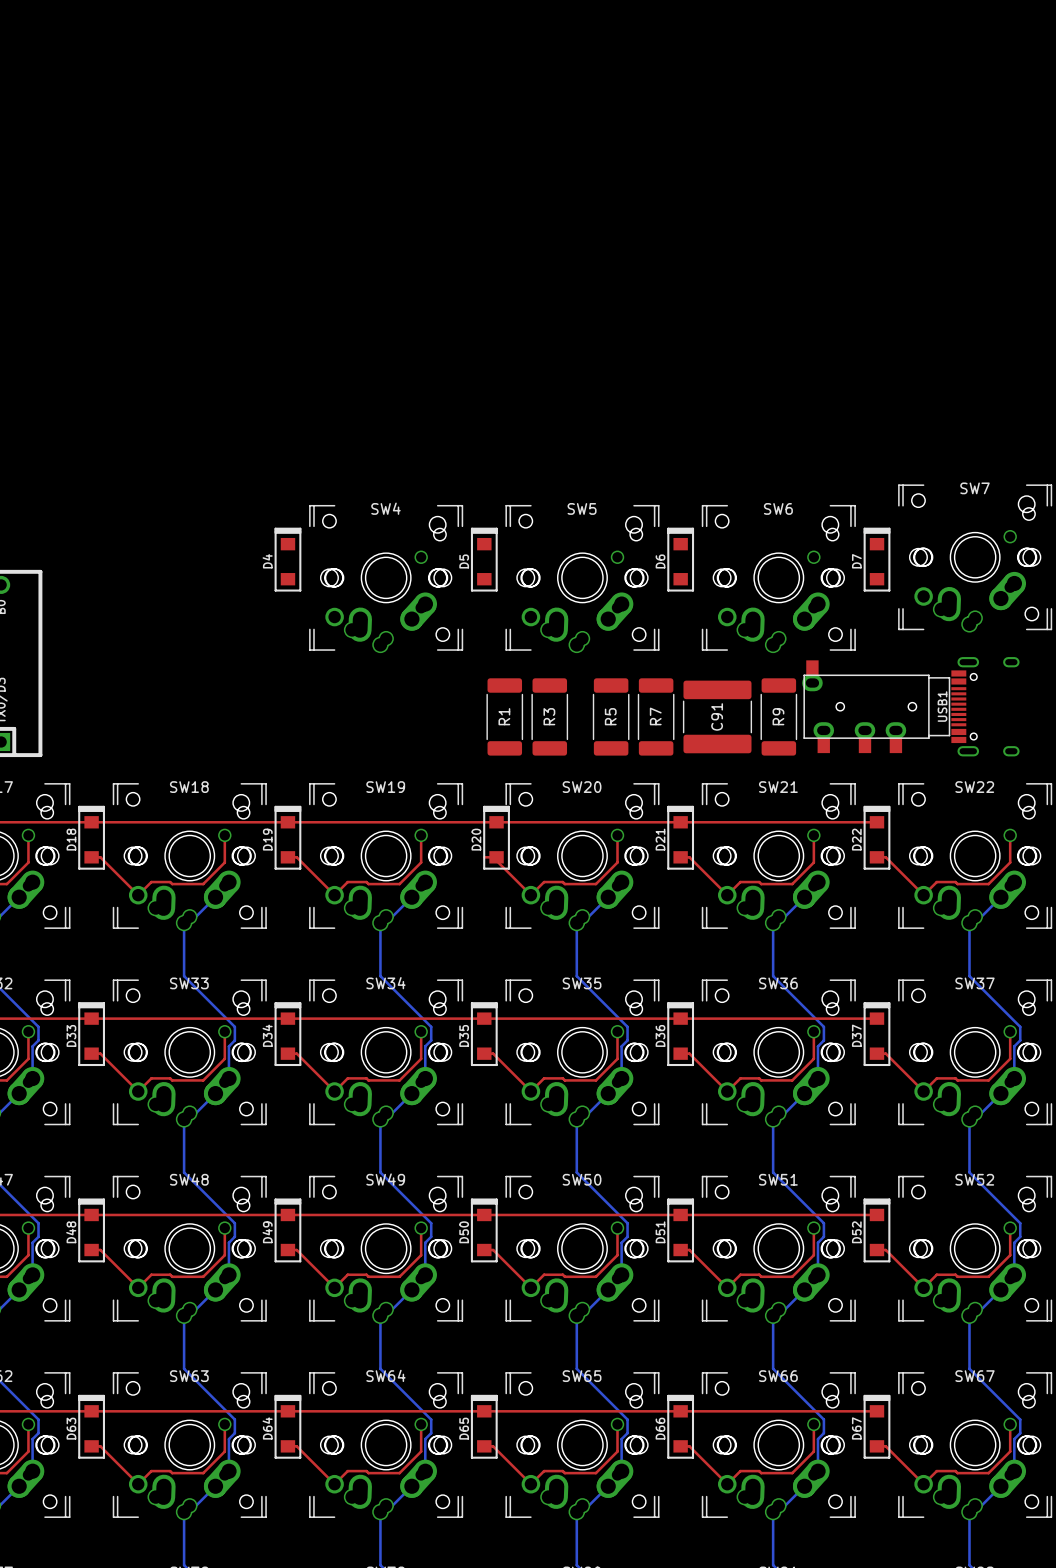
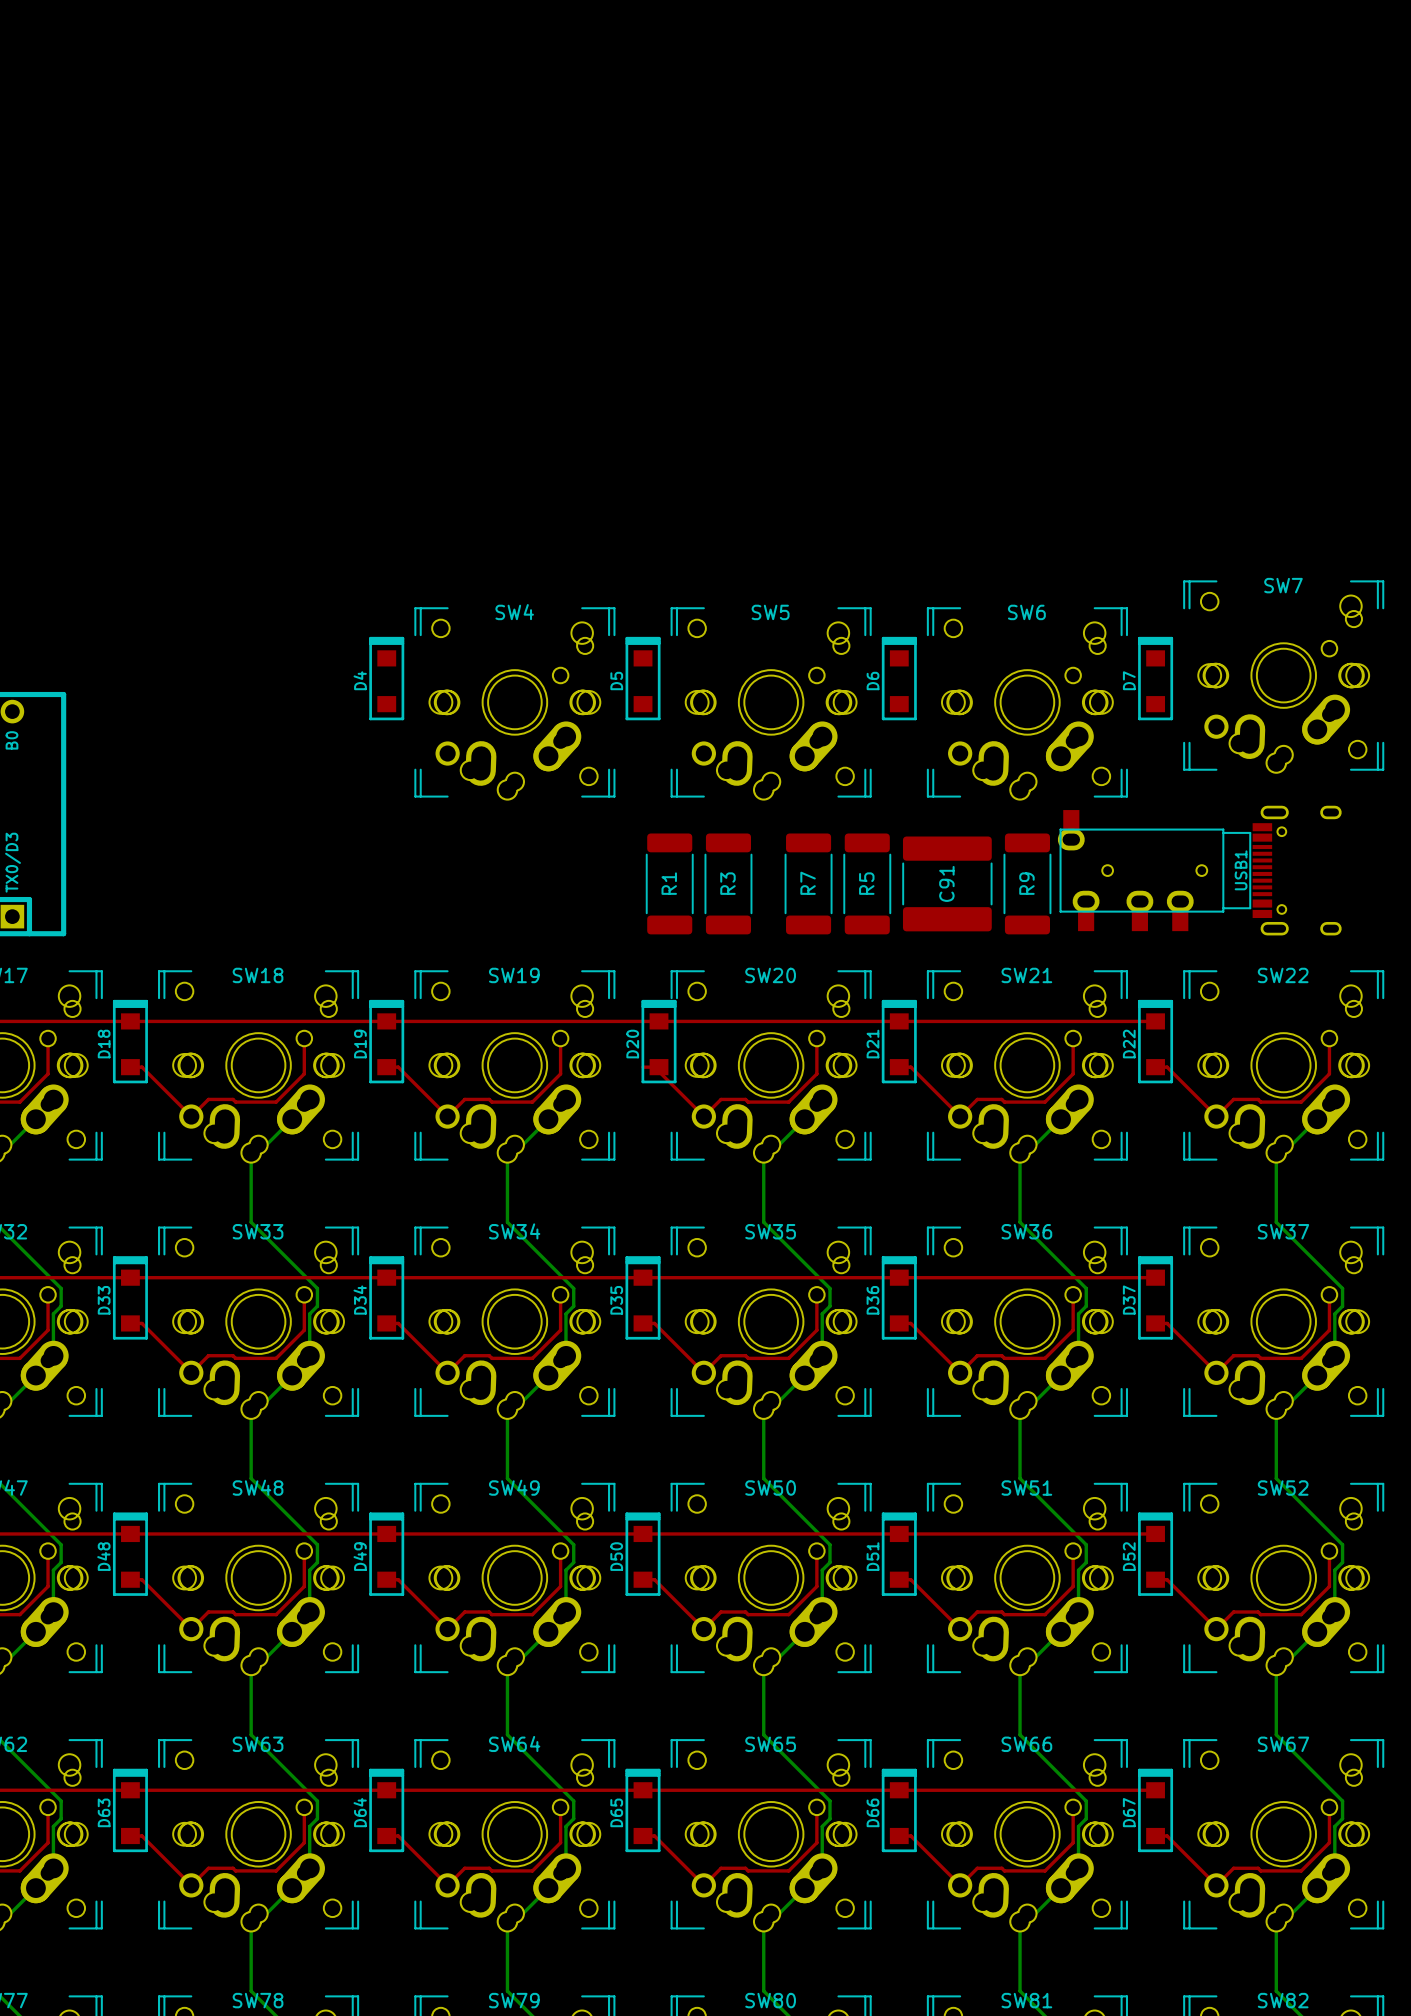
R5 name: R5 (610, 716) -> R7 (808, 883)
R7 name: R7 (655, 716) -> R5 (866, 883)

